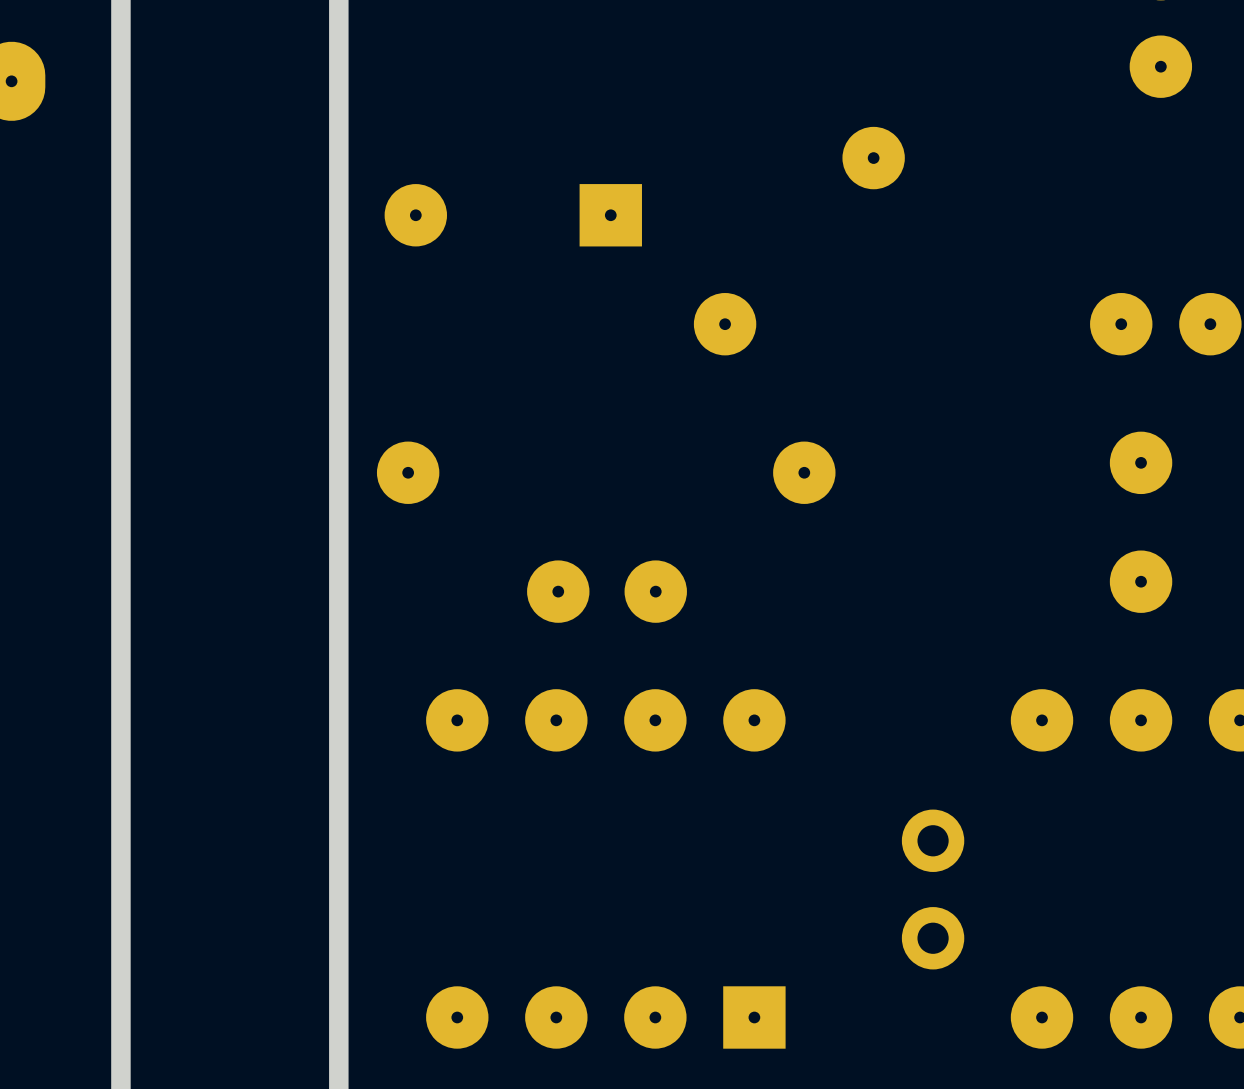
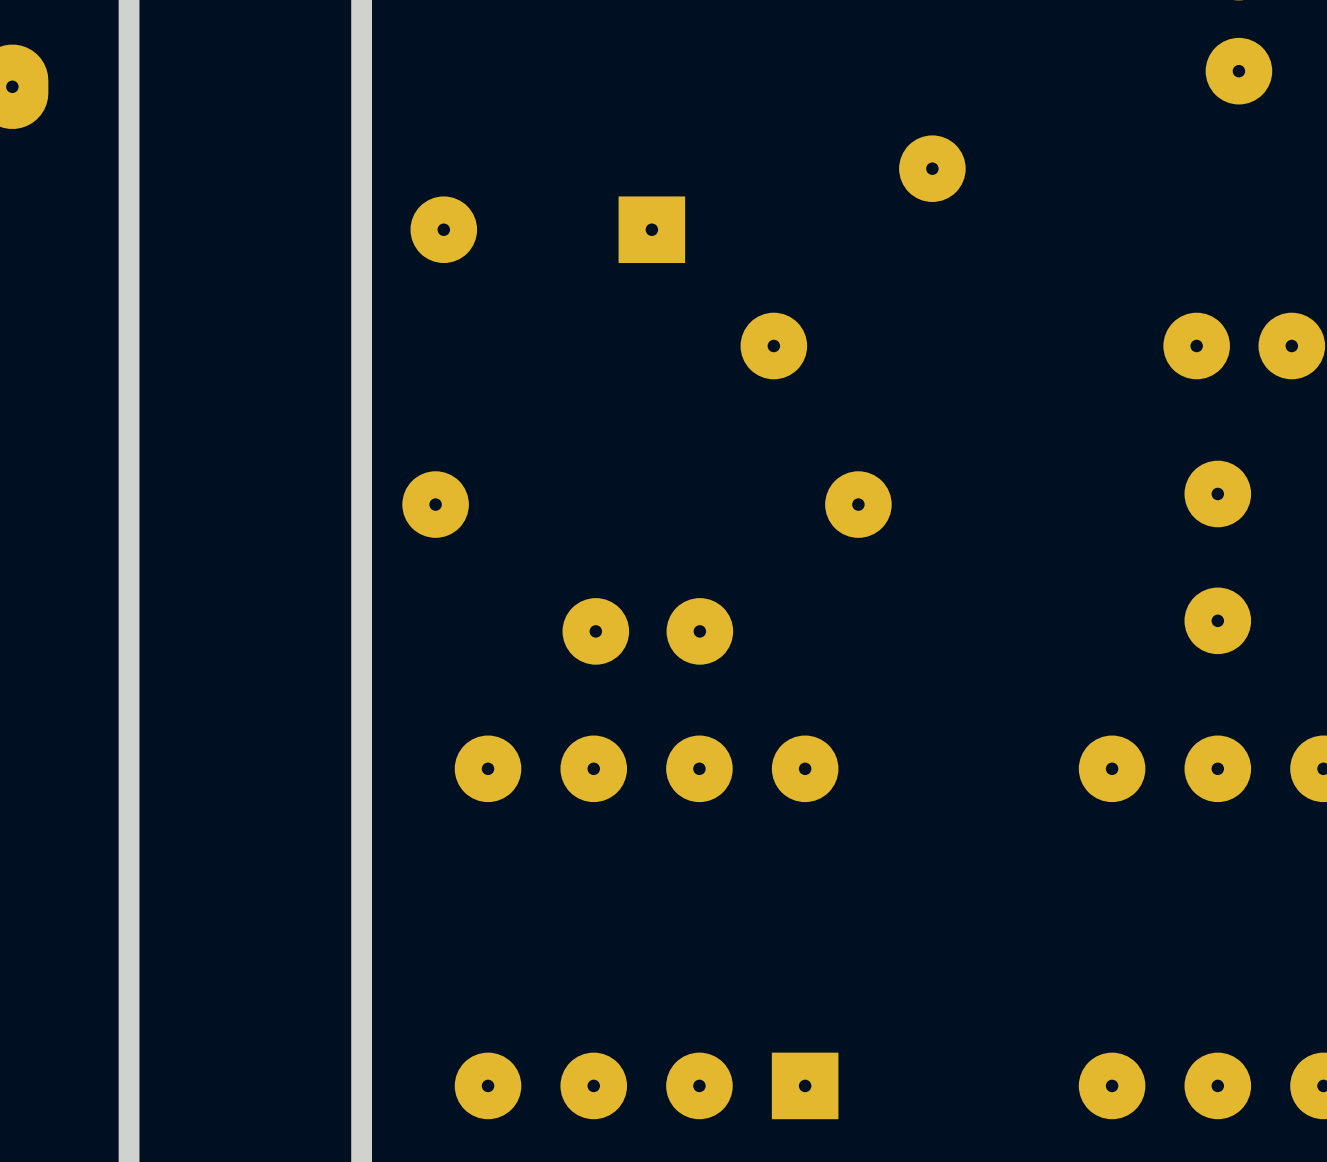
part: (933, 889) -> none

